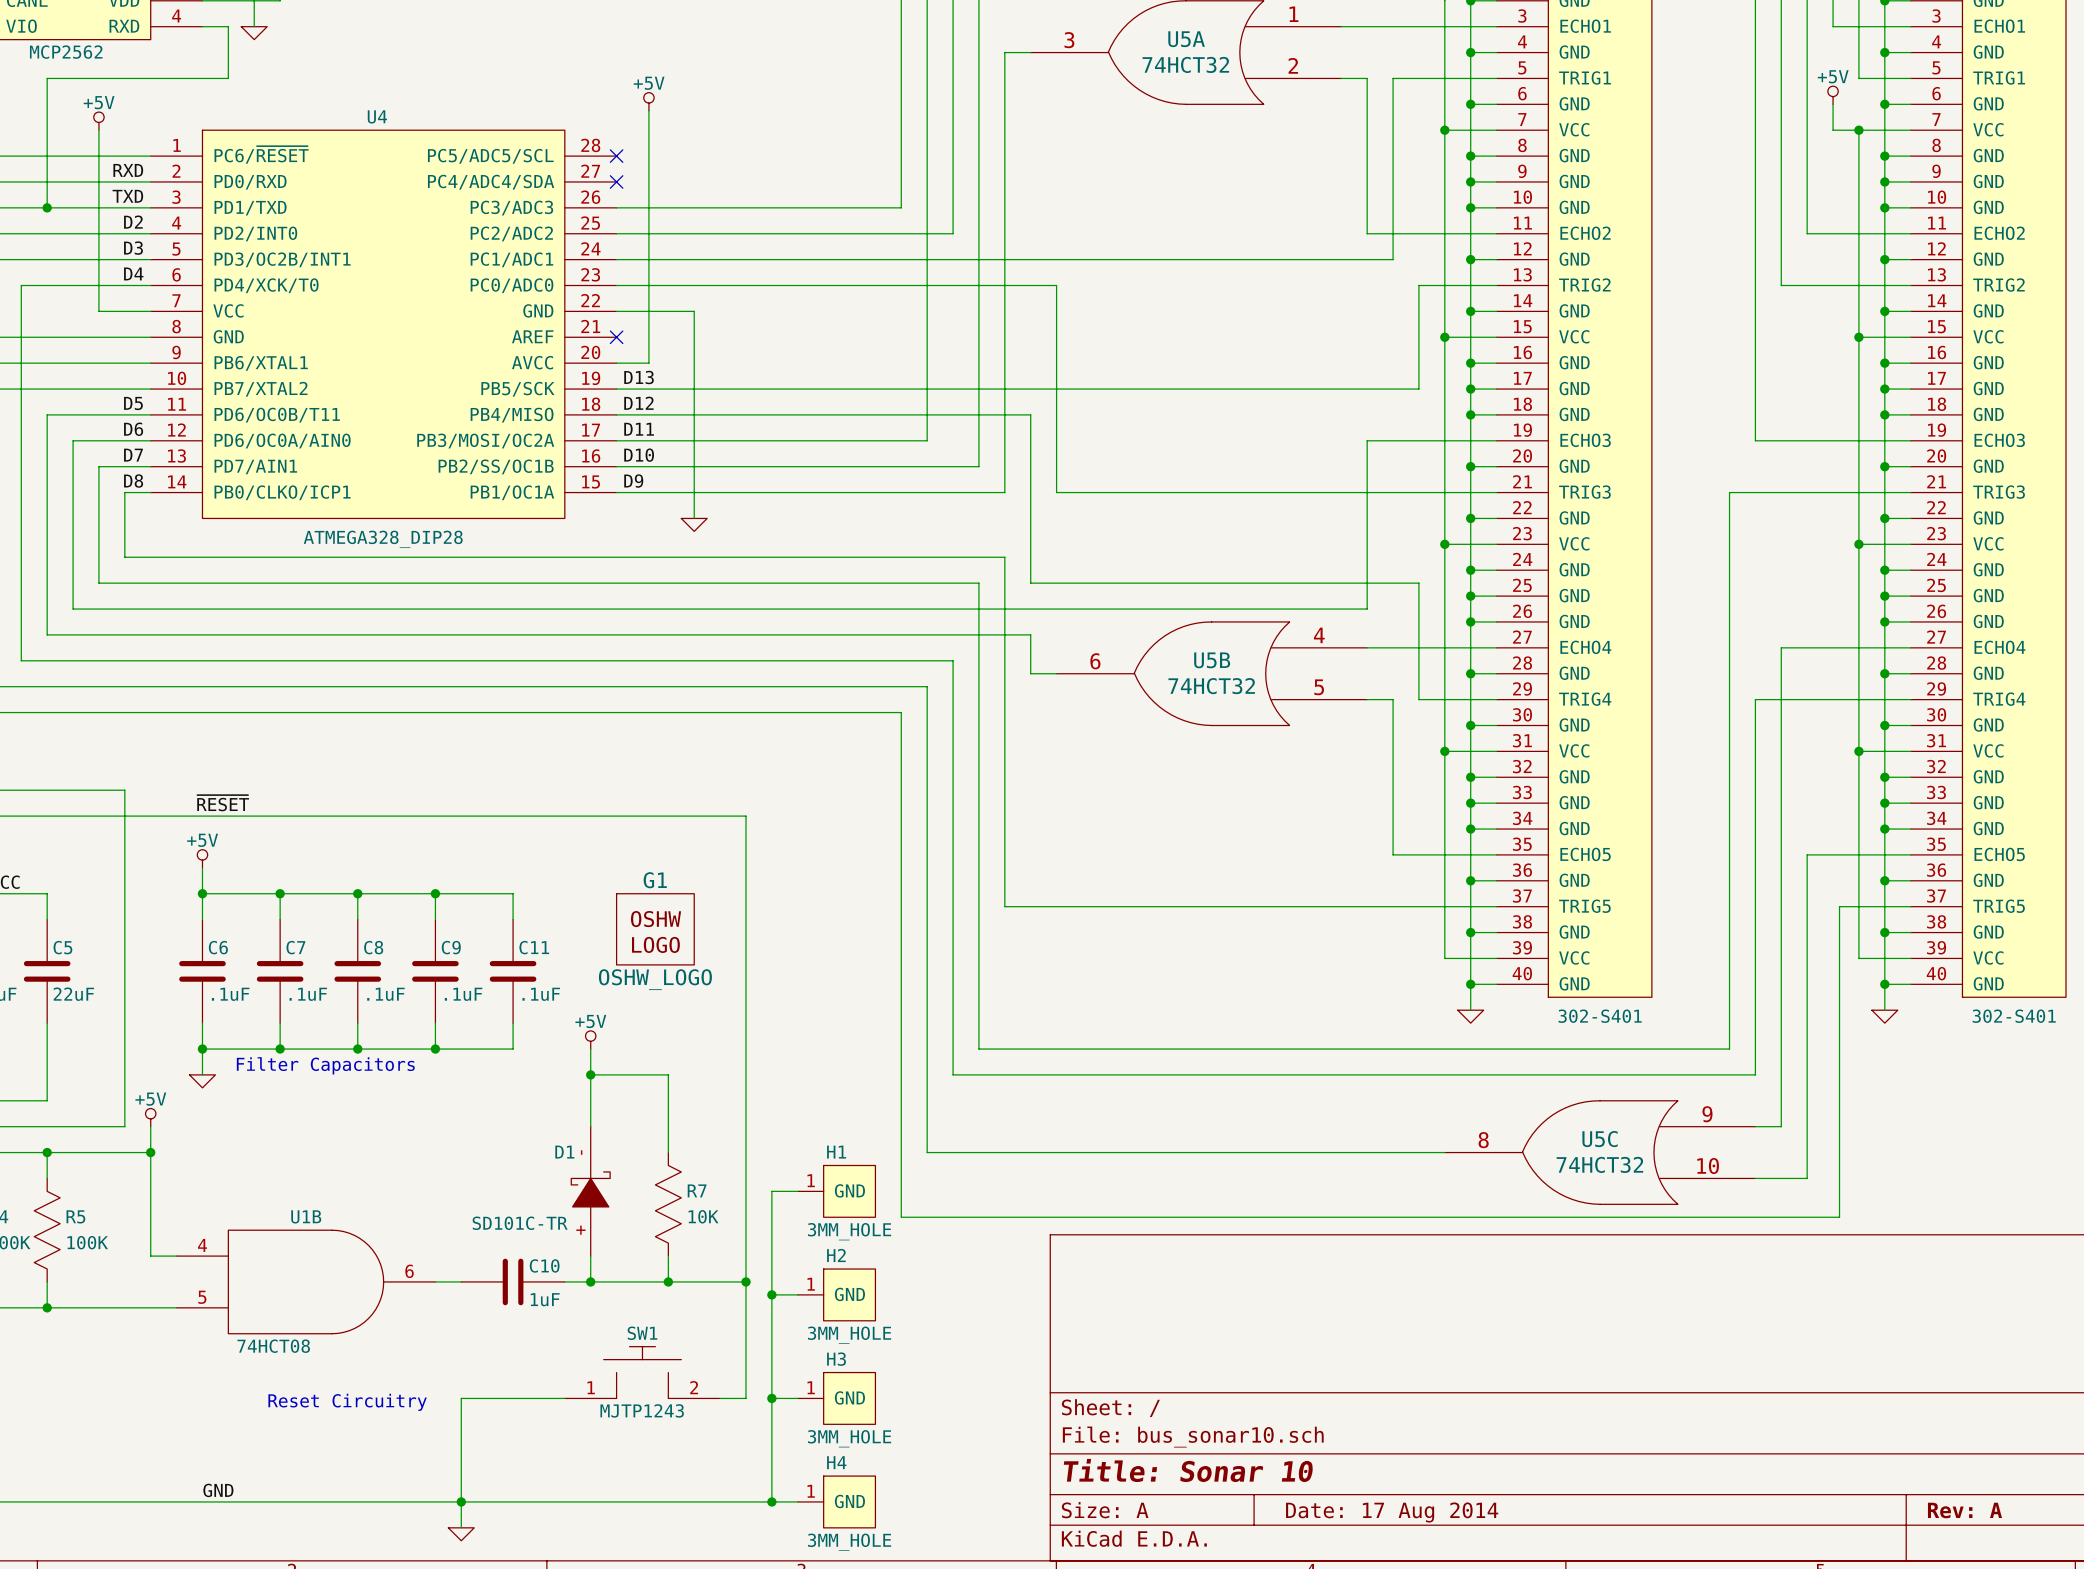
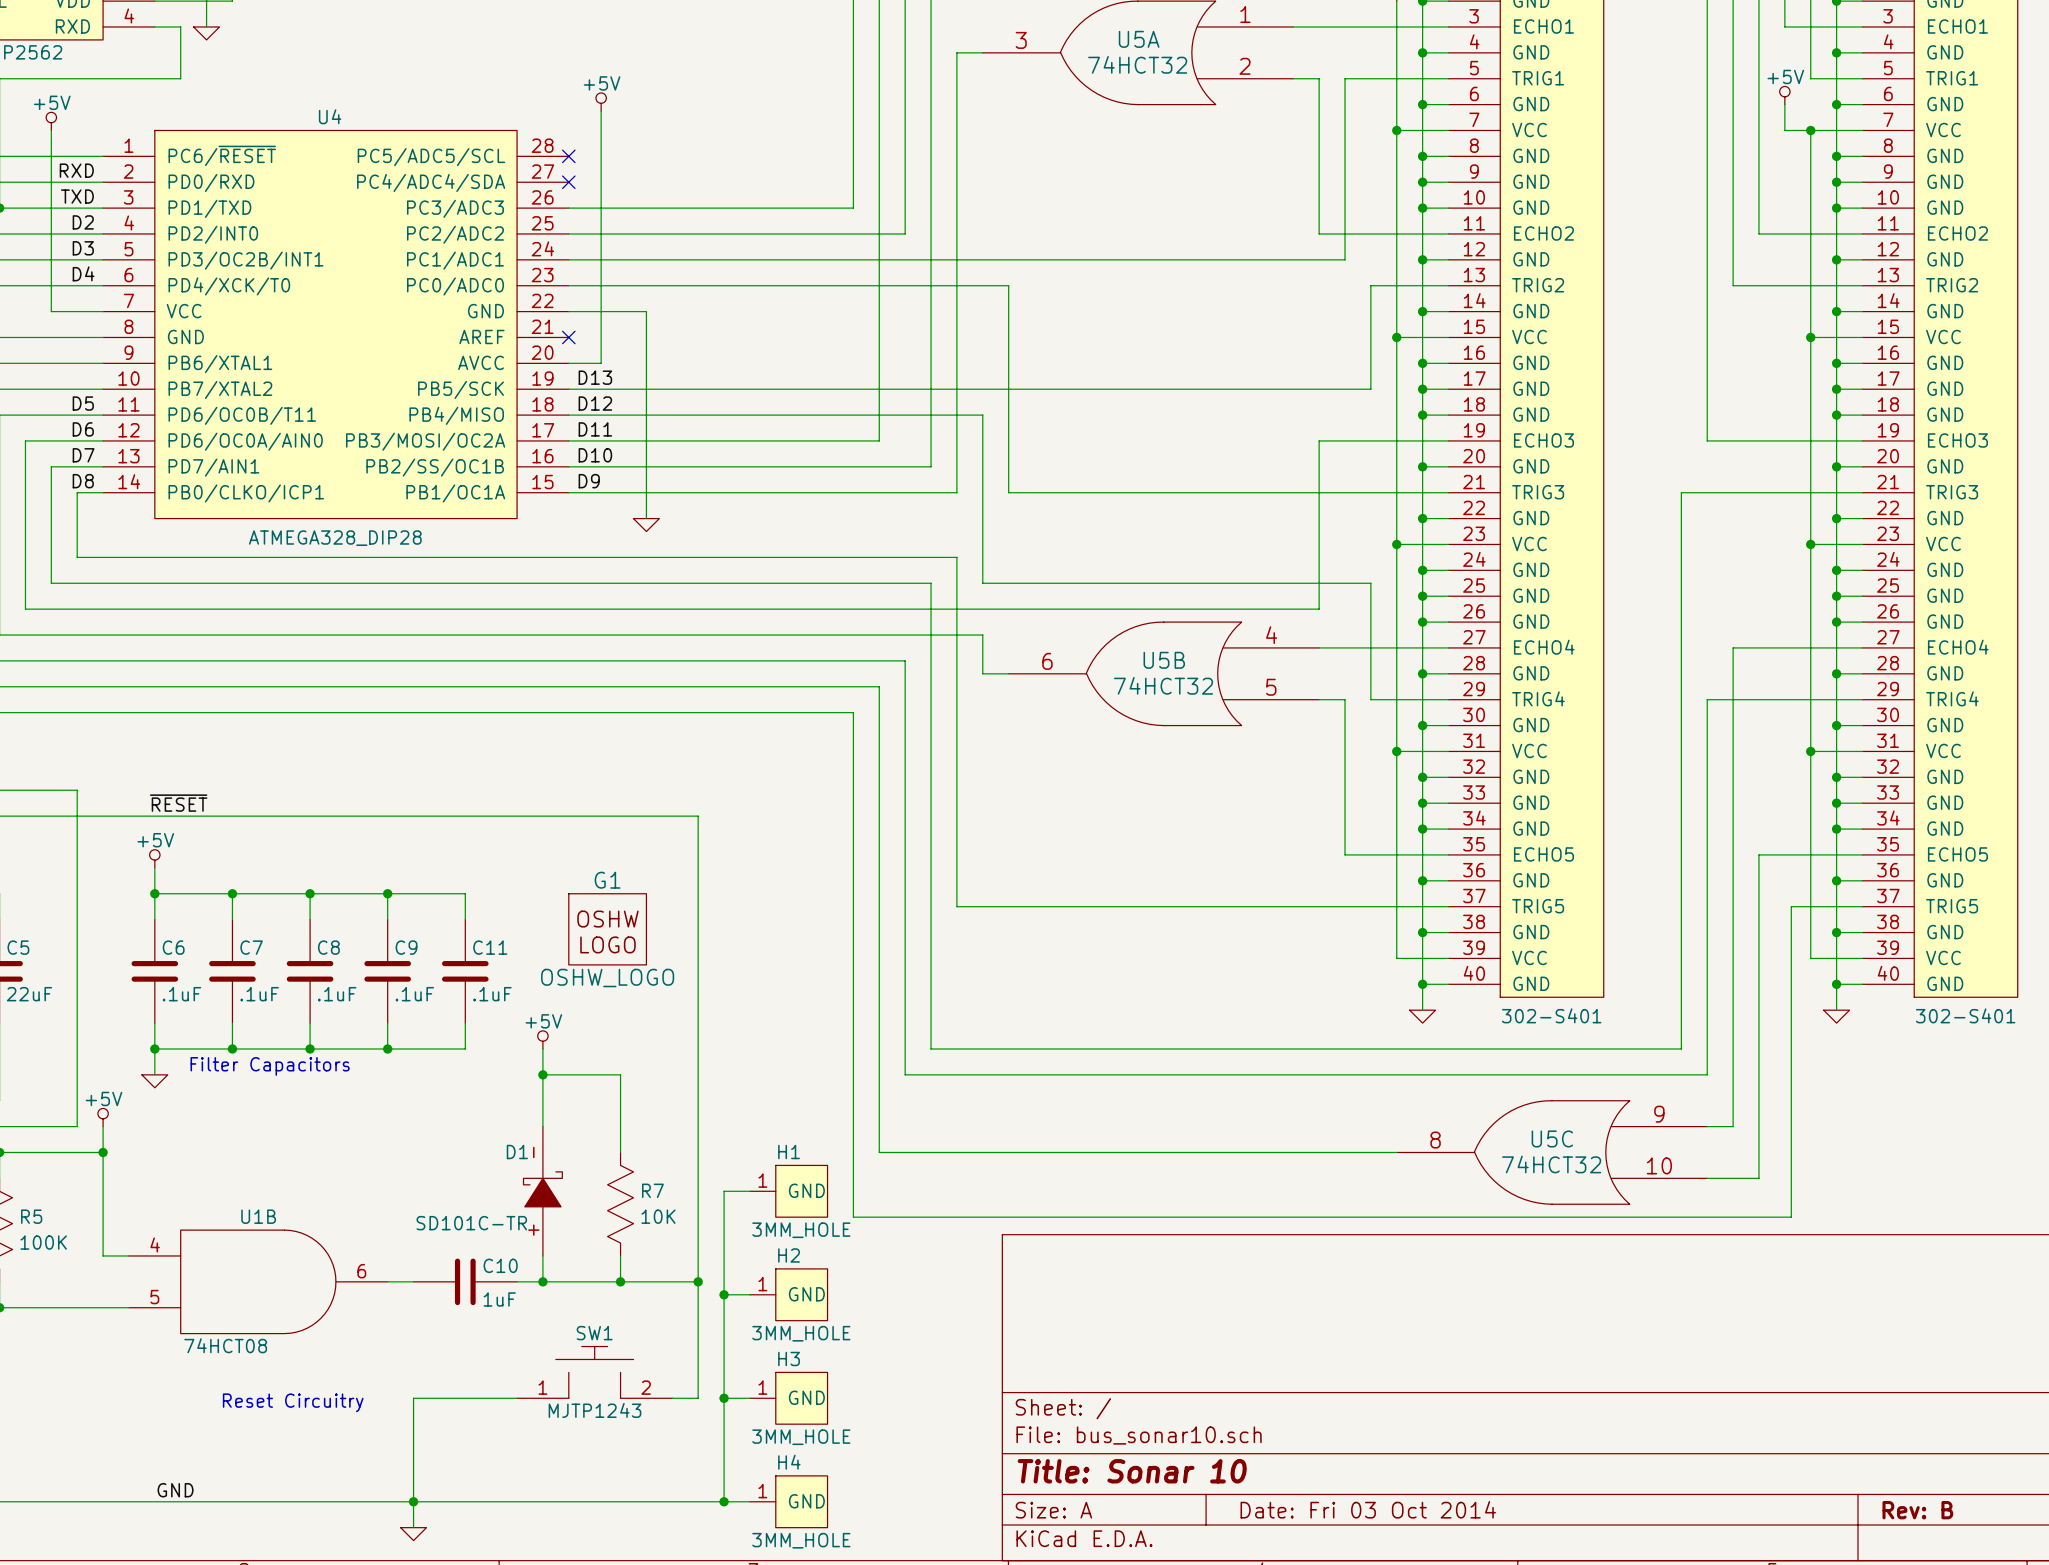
title block: Rev: A (1964, 1510) -> Rev: B (1917, 1510)
title block: Date: 17 Aug 2014 (1392, 1512) -> Date: Fri 03 Oct 2014 (1368, 1509)

